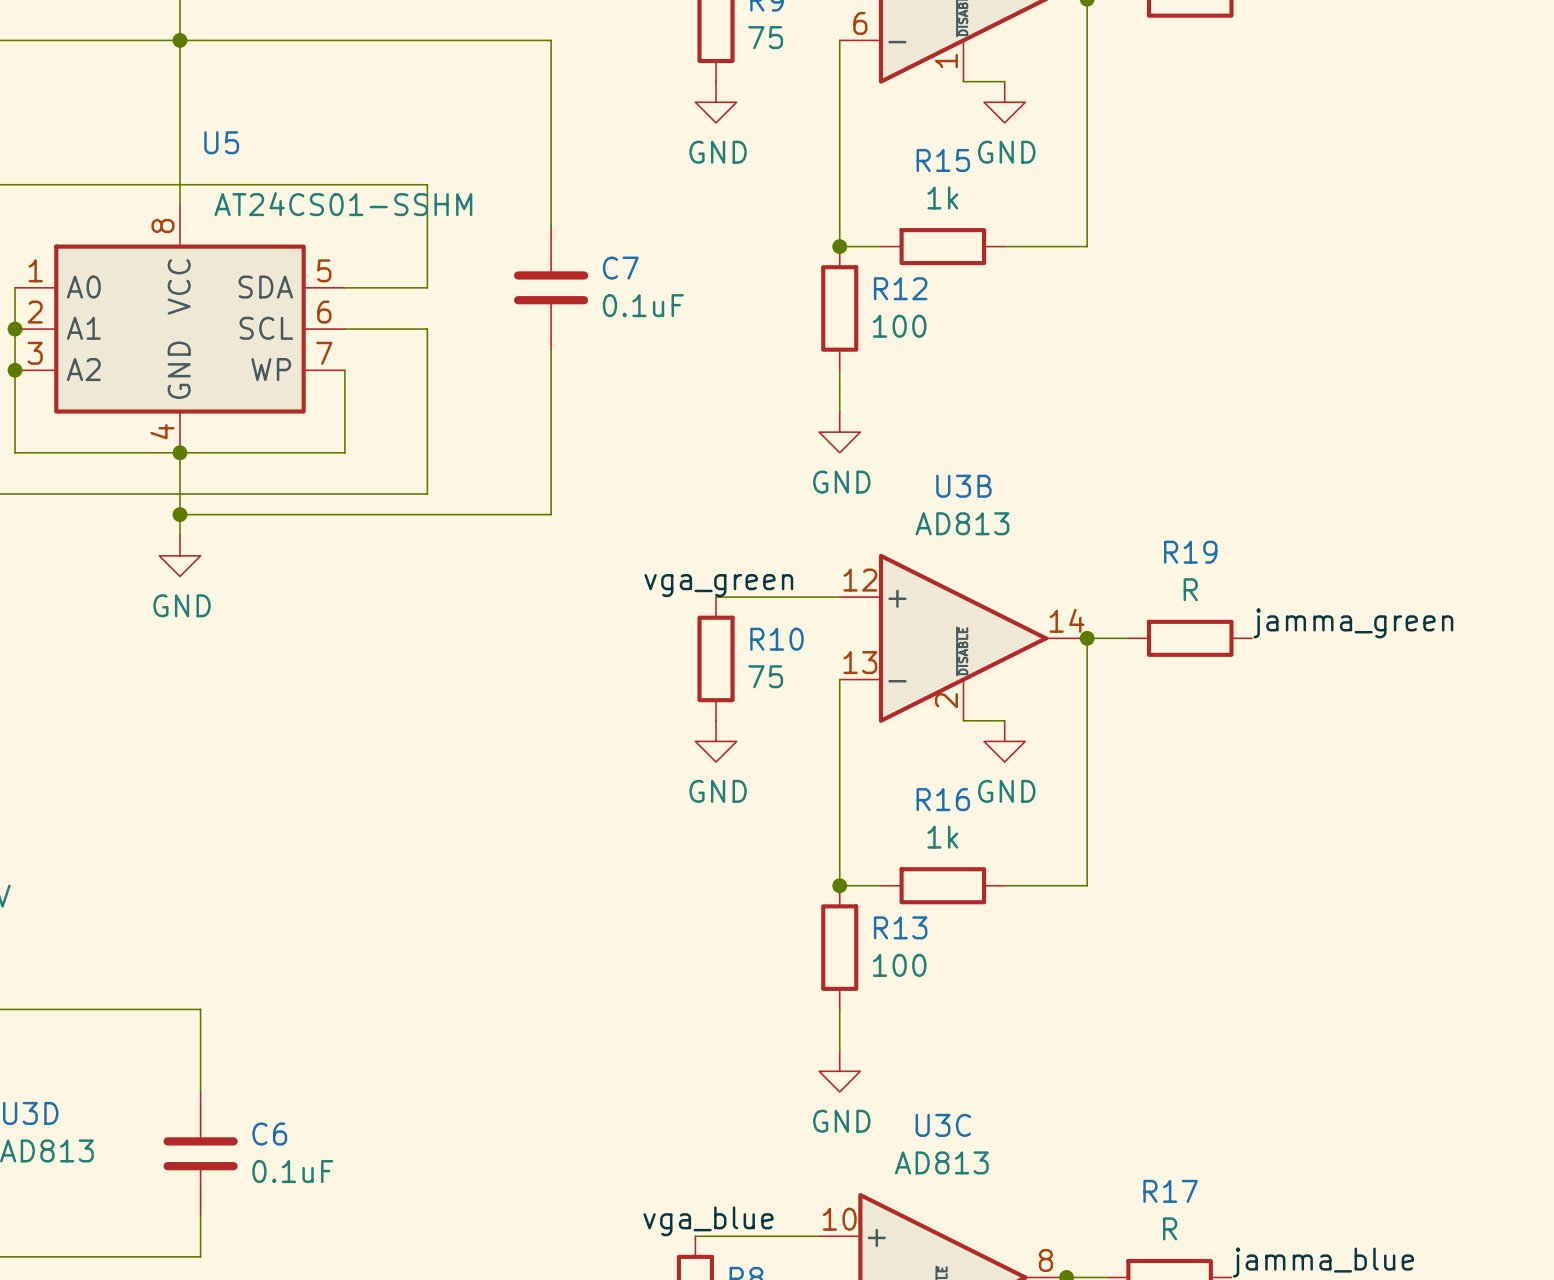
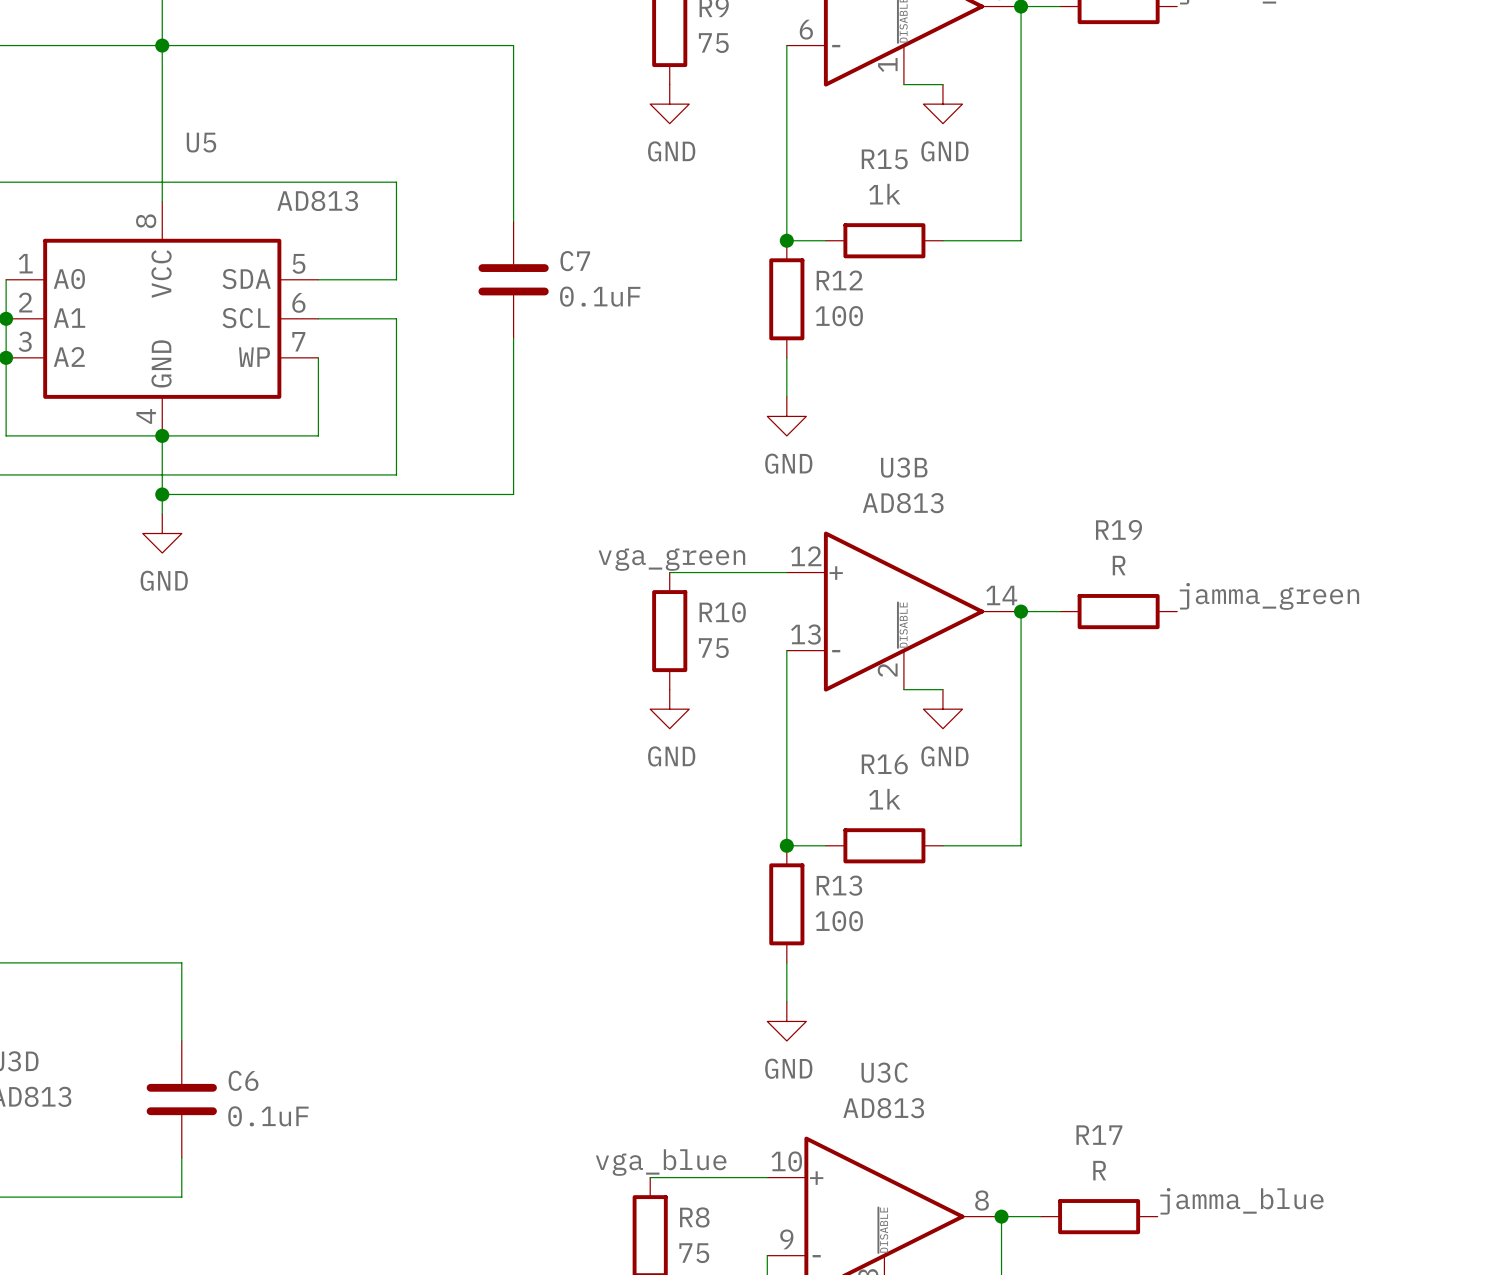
U5 value: AT24CS01-SSHM (343, 204) -> AD813 (317, 200)

